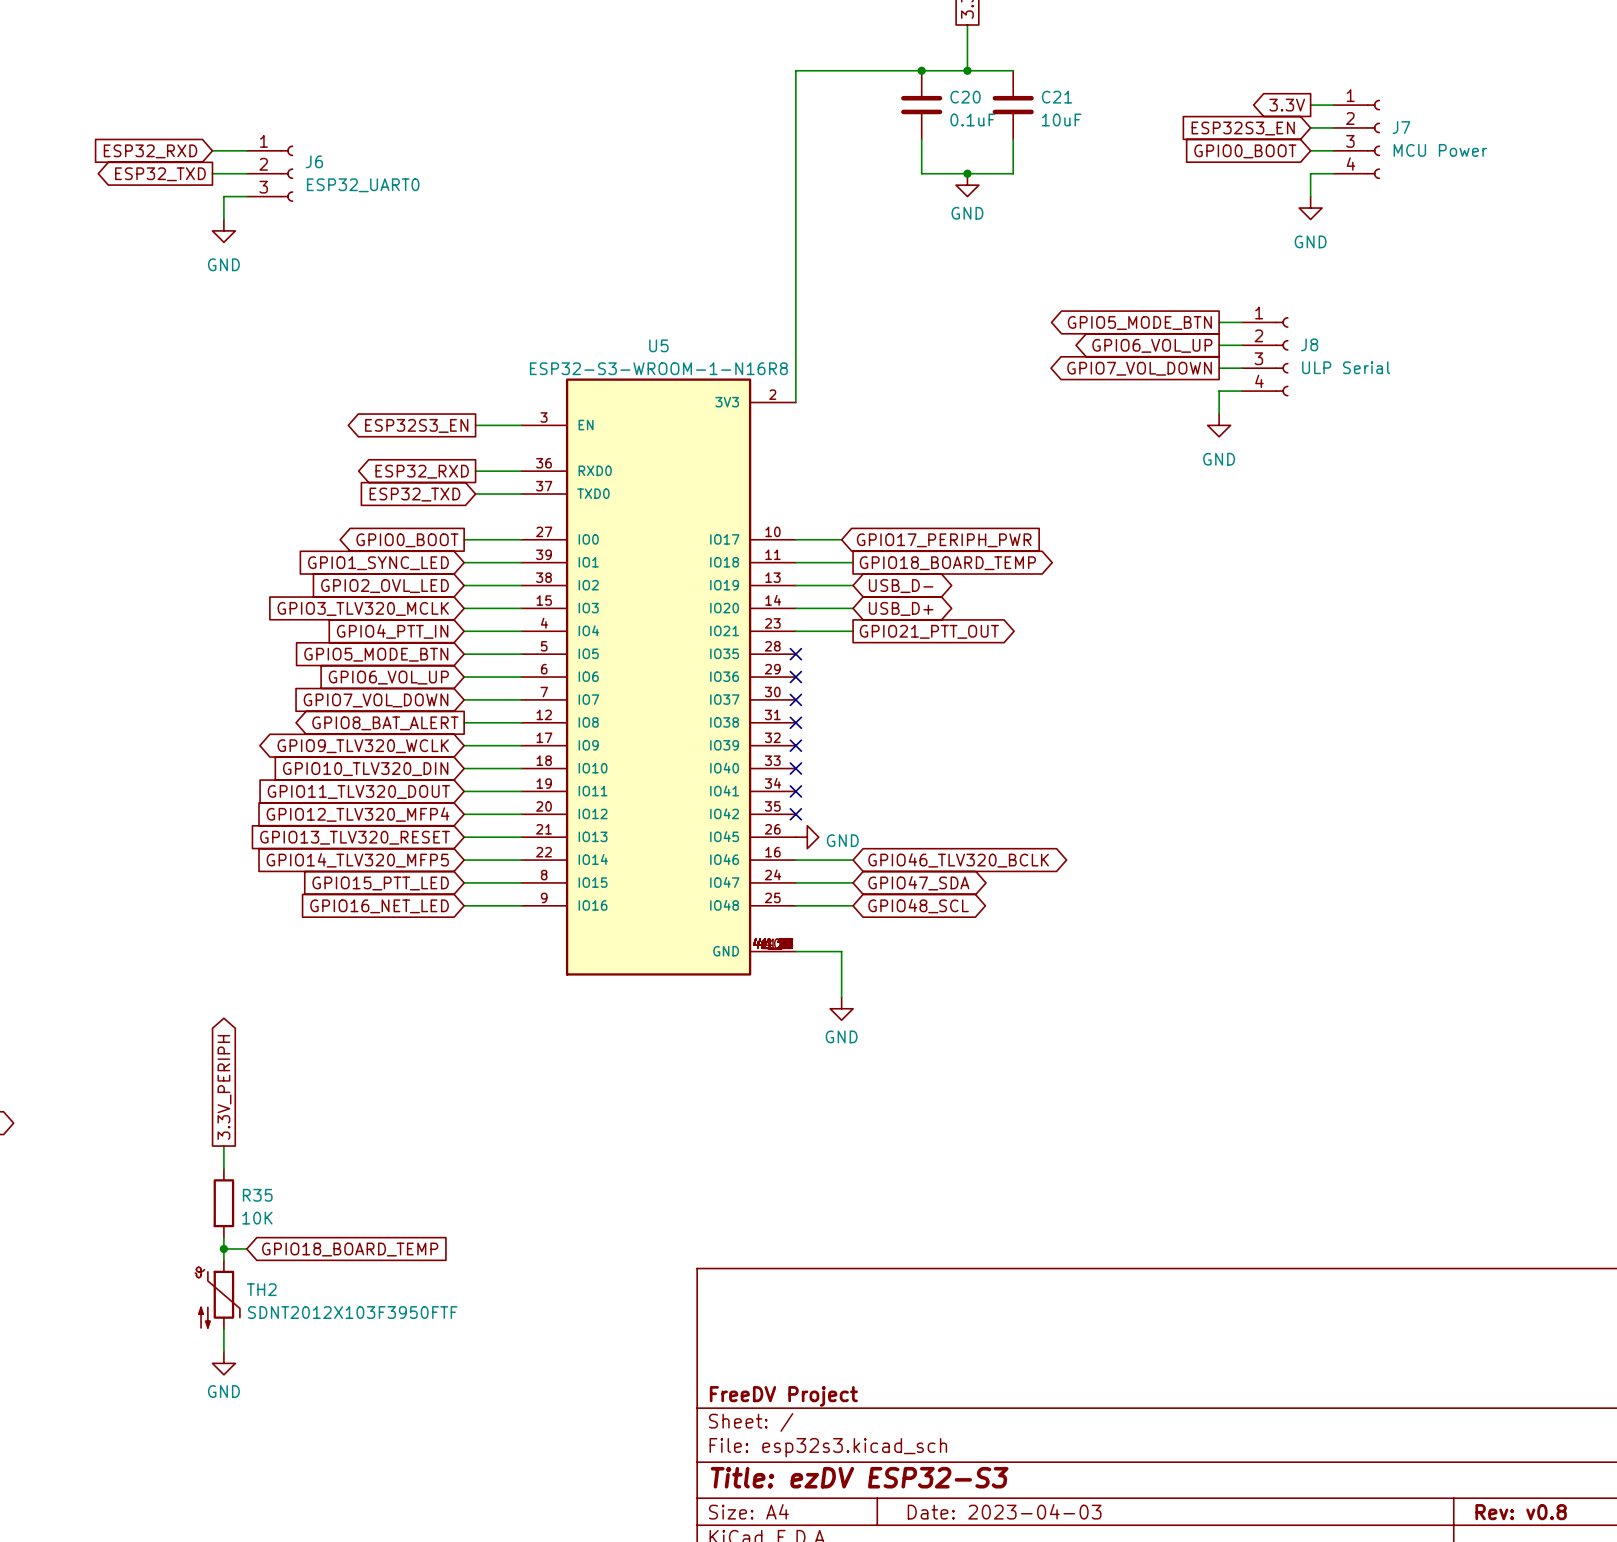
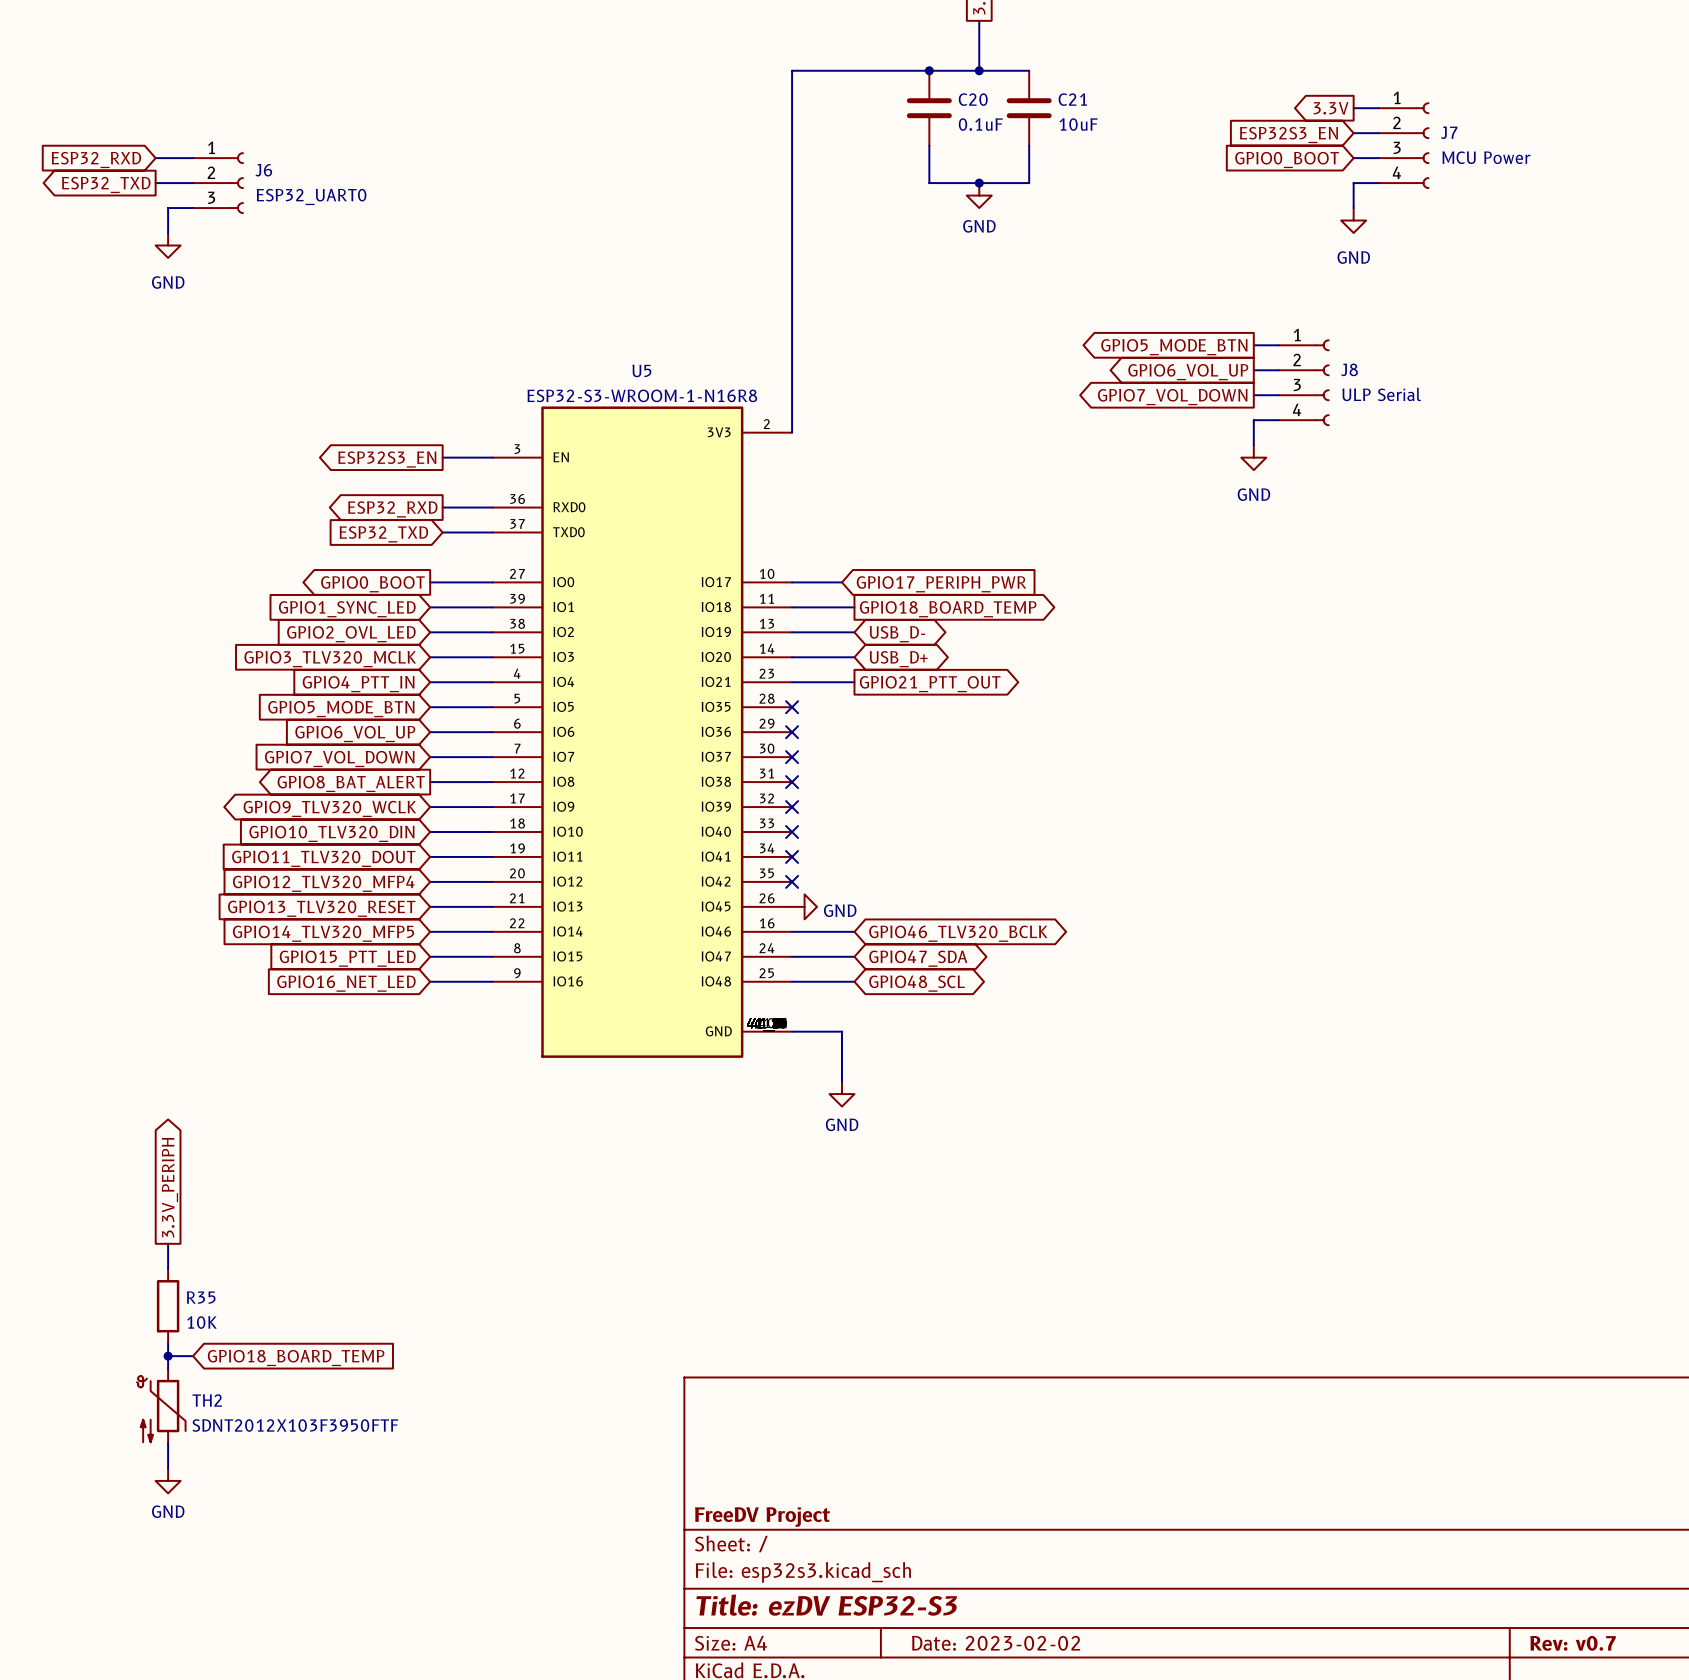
title block: Date: 2023-04-03 (1004, 1511) -> Date: 2023-02-02 (996, 1643)
title block: Rev: v0.8 (1521, 1512) -> Rev: v0.7 (1573, 1643)

